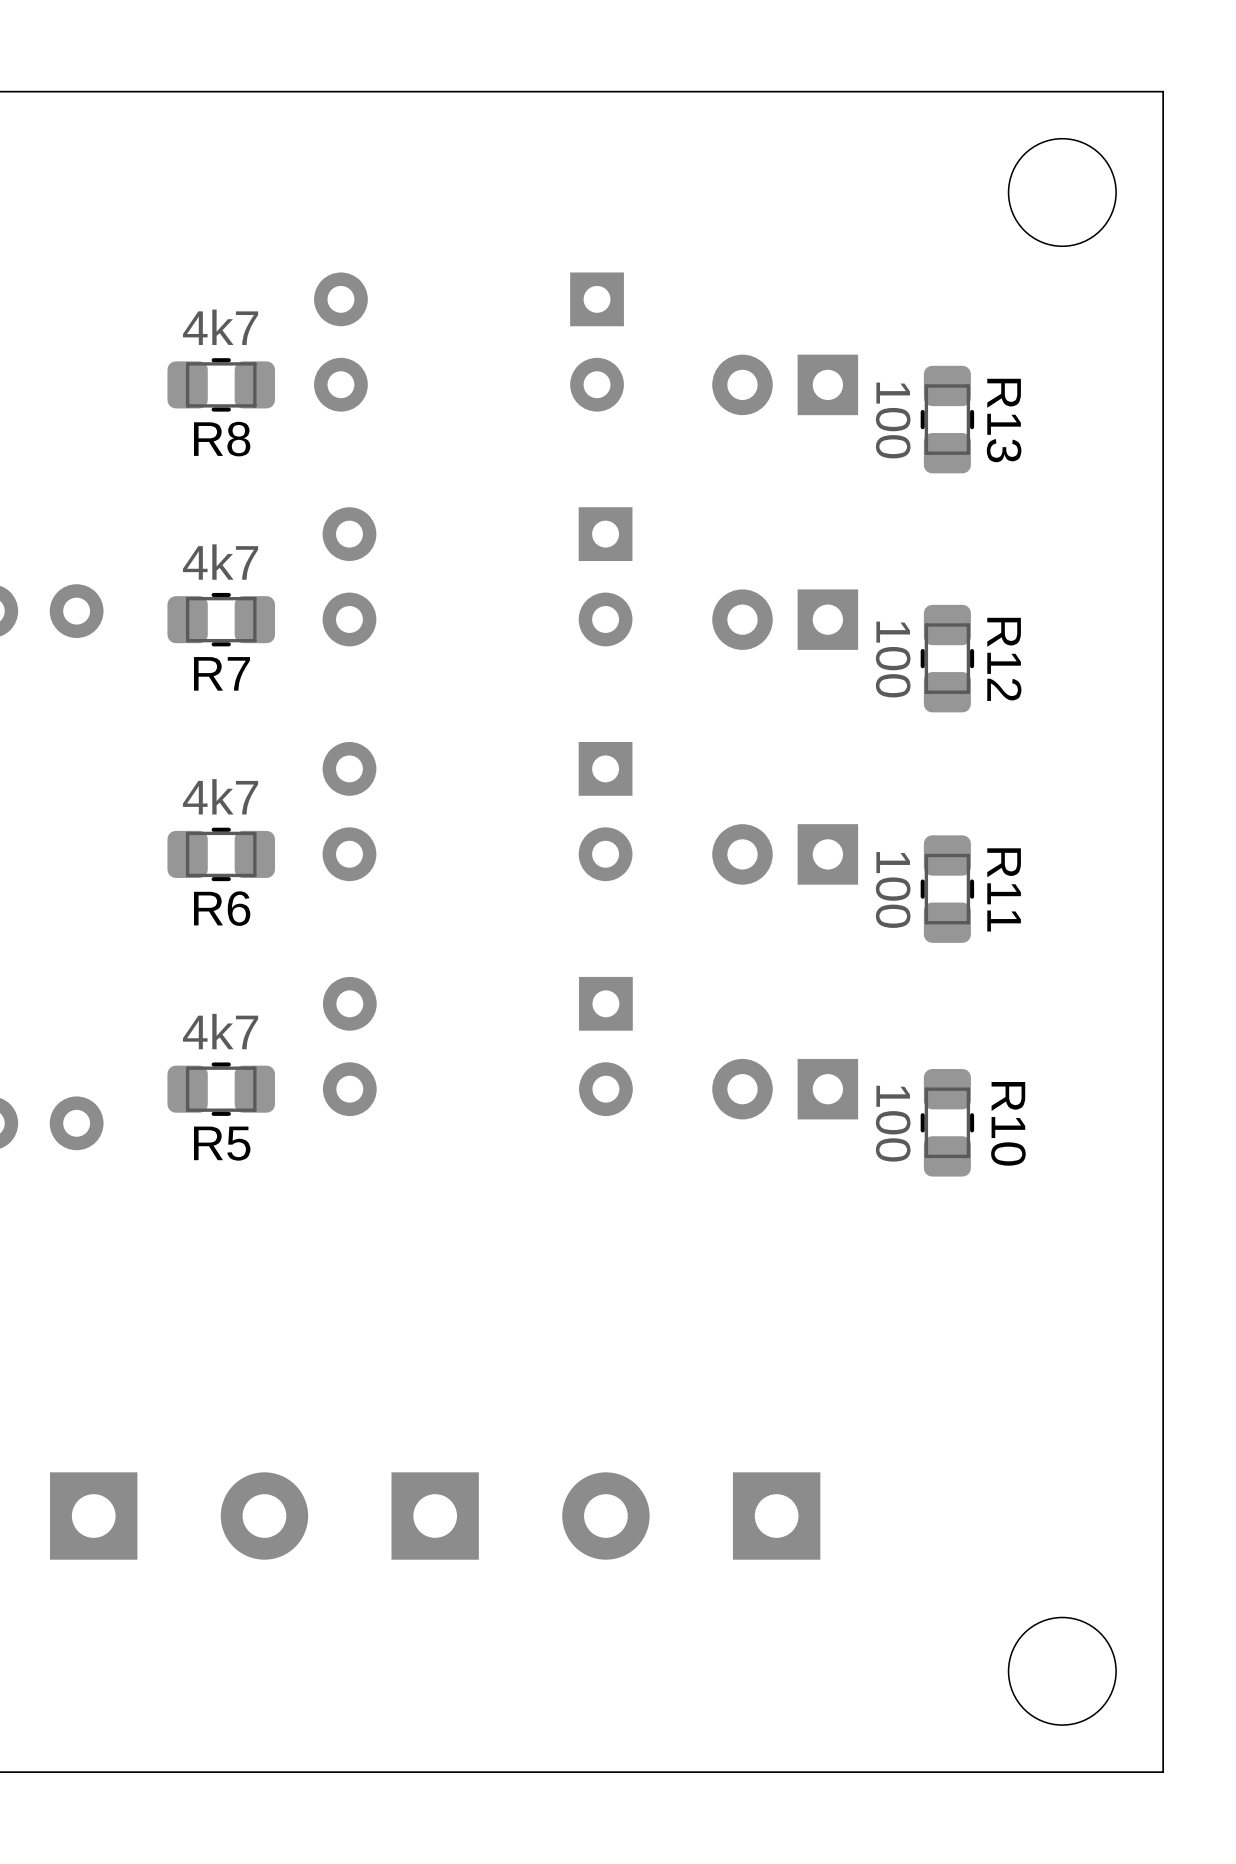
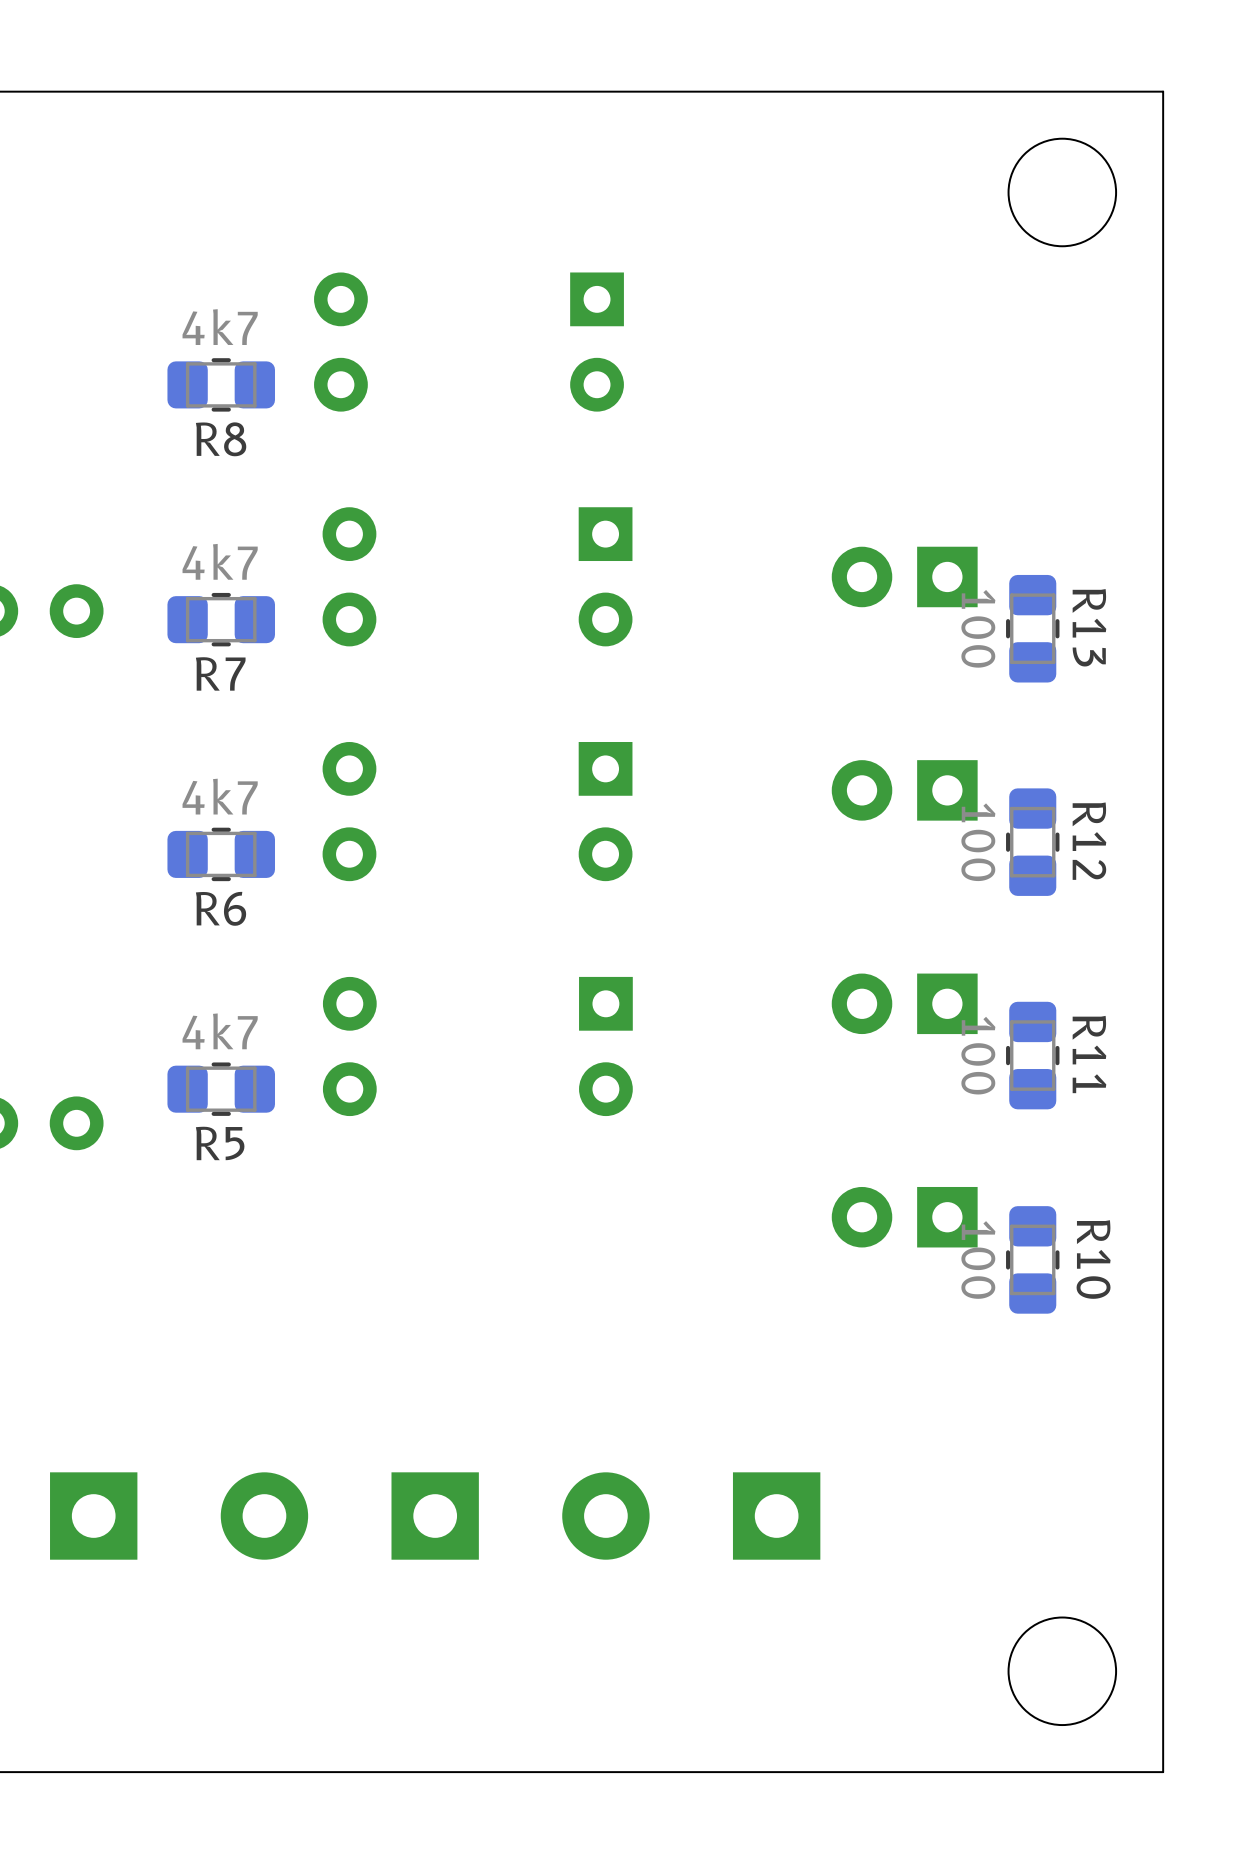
part: (785, 384) -> none
R13 position: (947, 419) -> (1032, 628)
part: none -> (904, 576)
part: (785, 619) -> none
R12 position: (947, 658) -> (1032, 842)
part: none -> (904, 790)
part: (785, 854) -> none
R11 position: (947, 889) -> (1032, 1055)
part: none -> (904, 1003)
part: (785, 1089) -> none
R10 position: (947, 1122) -> (1032, 1259)
part: none -> (904, 1217)

